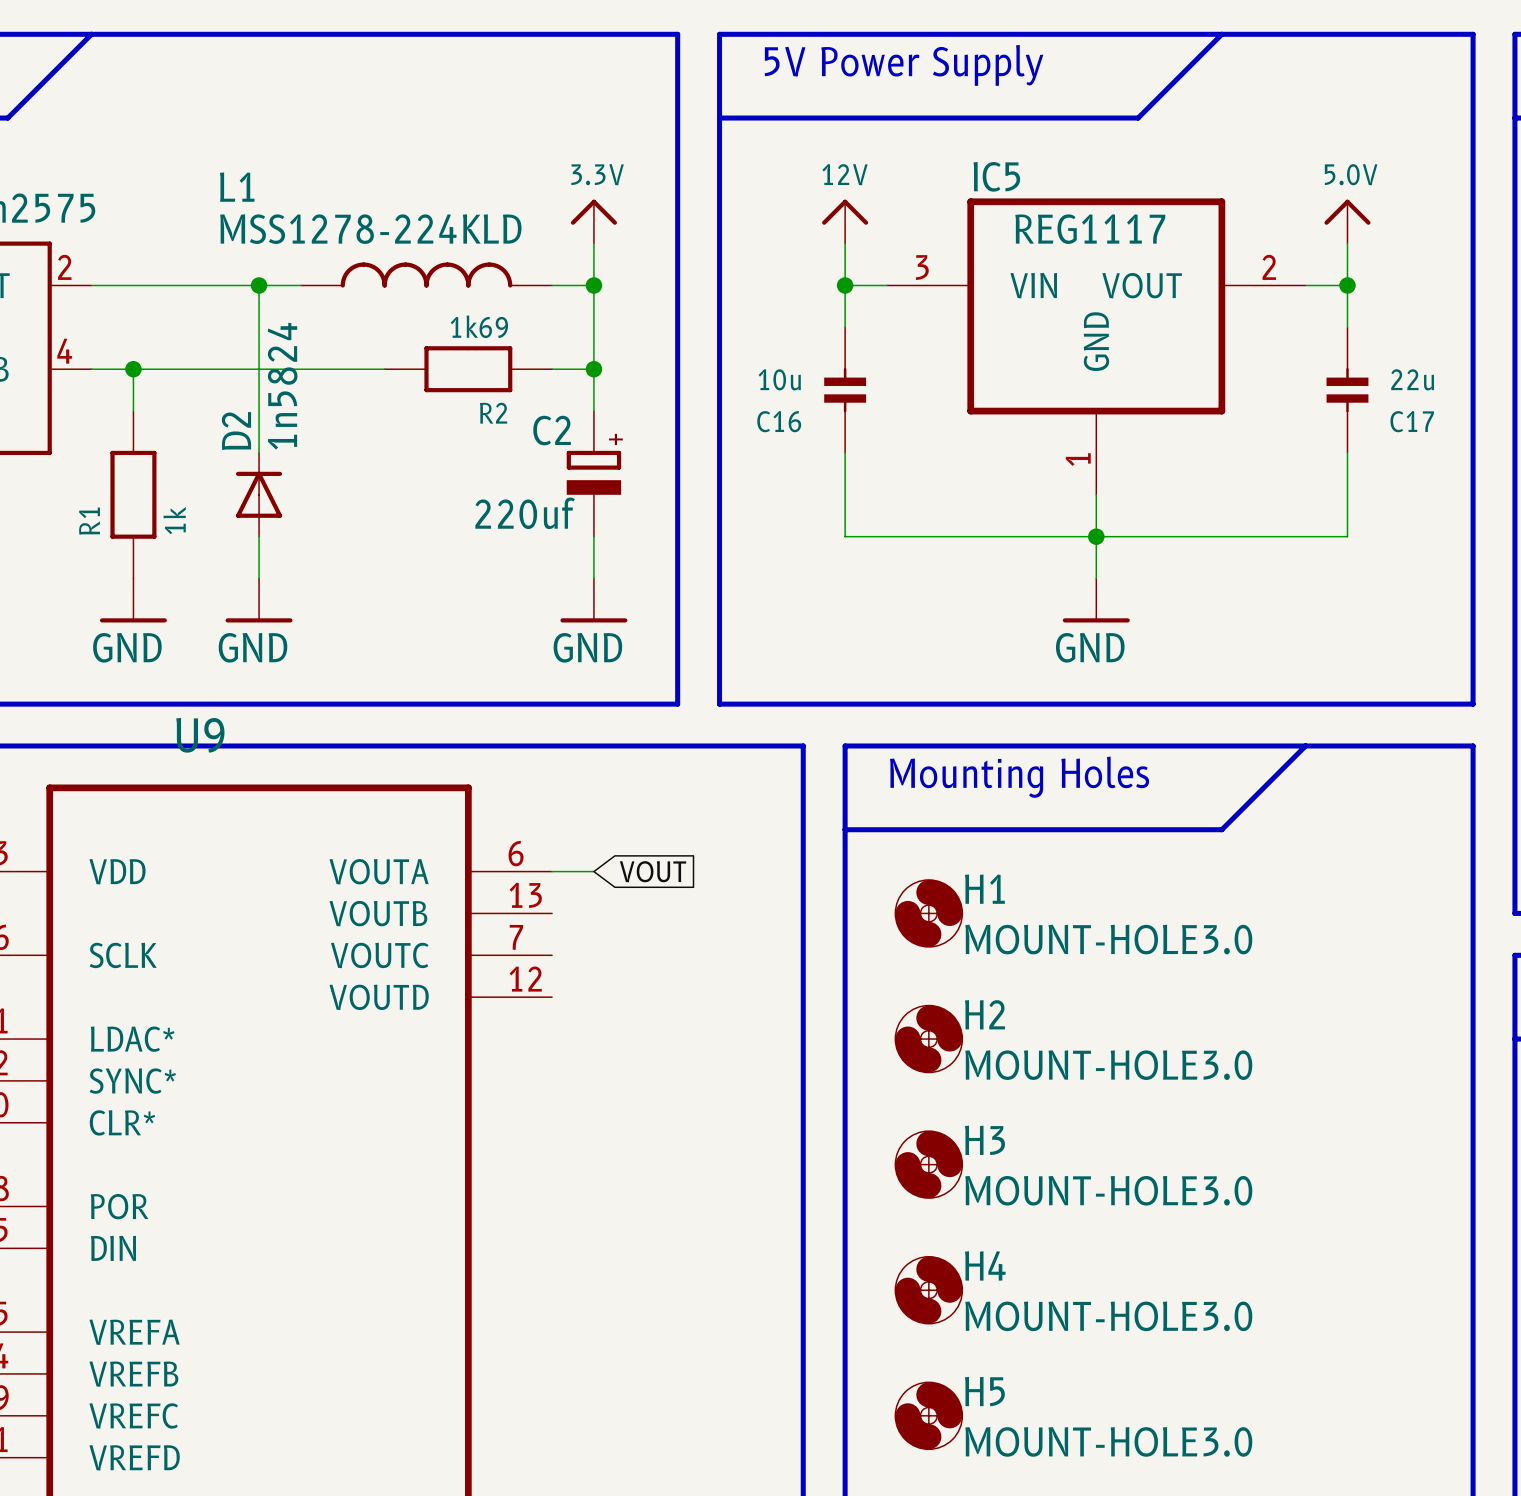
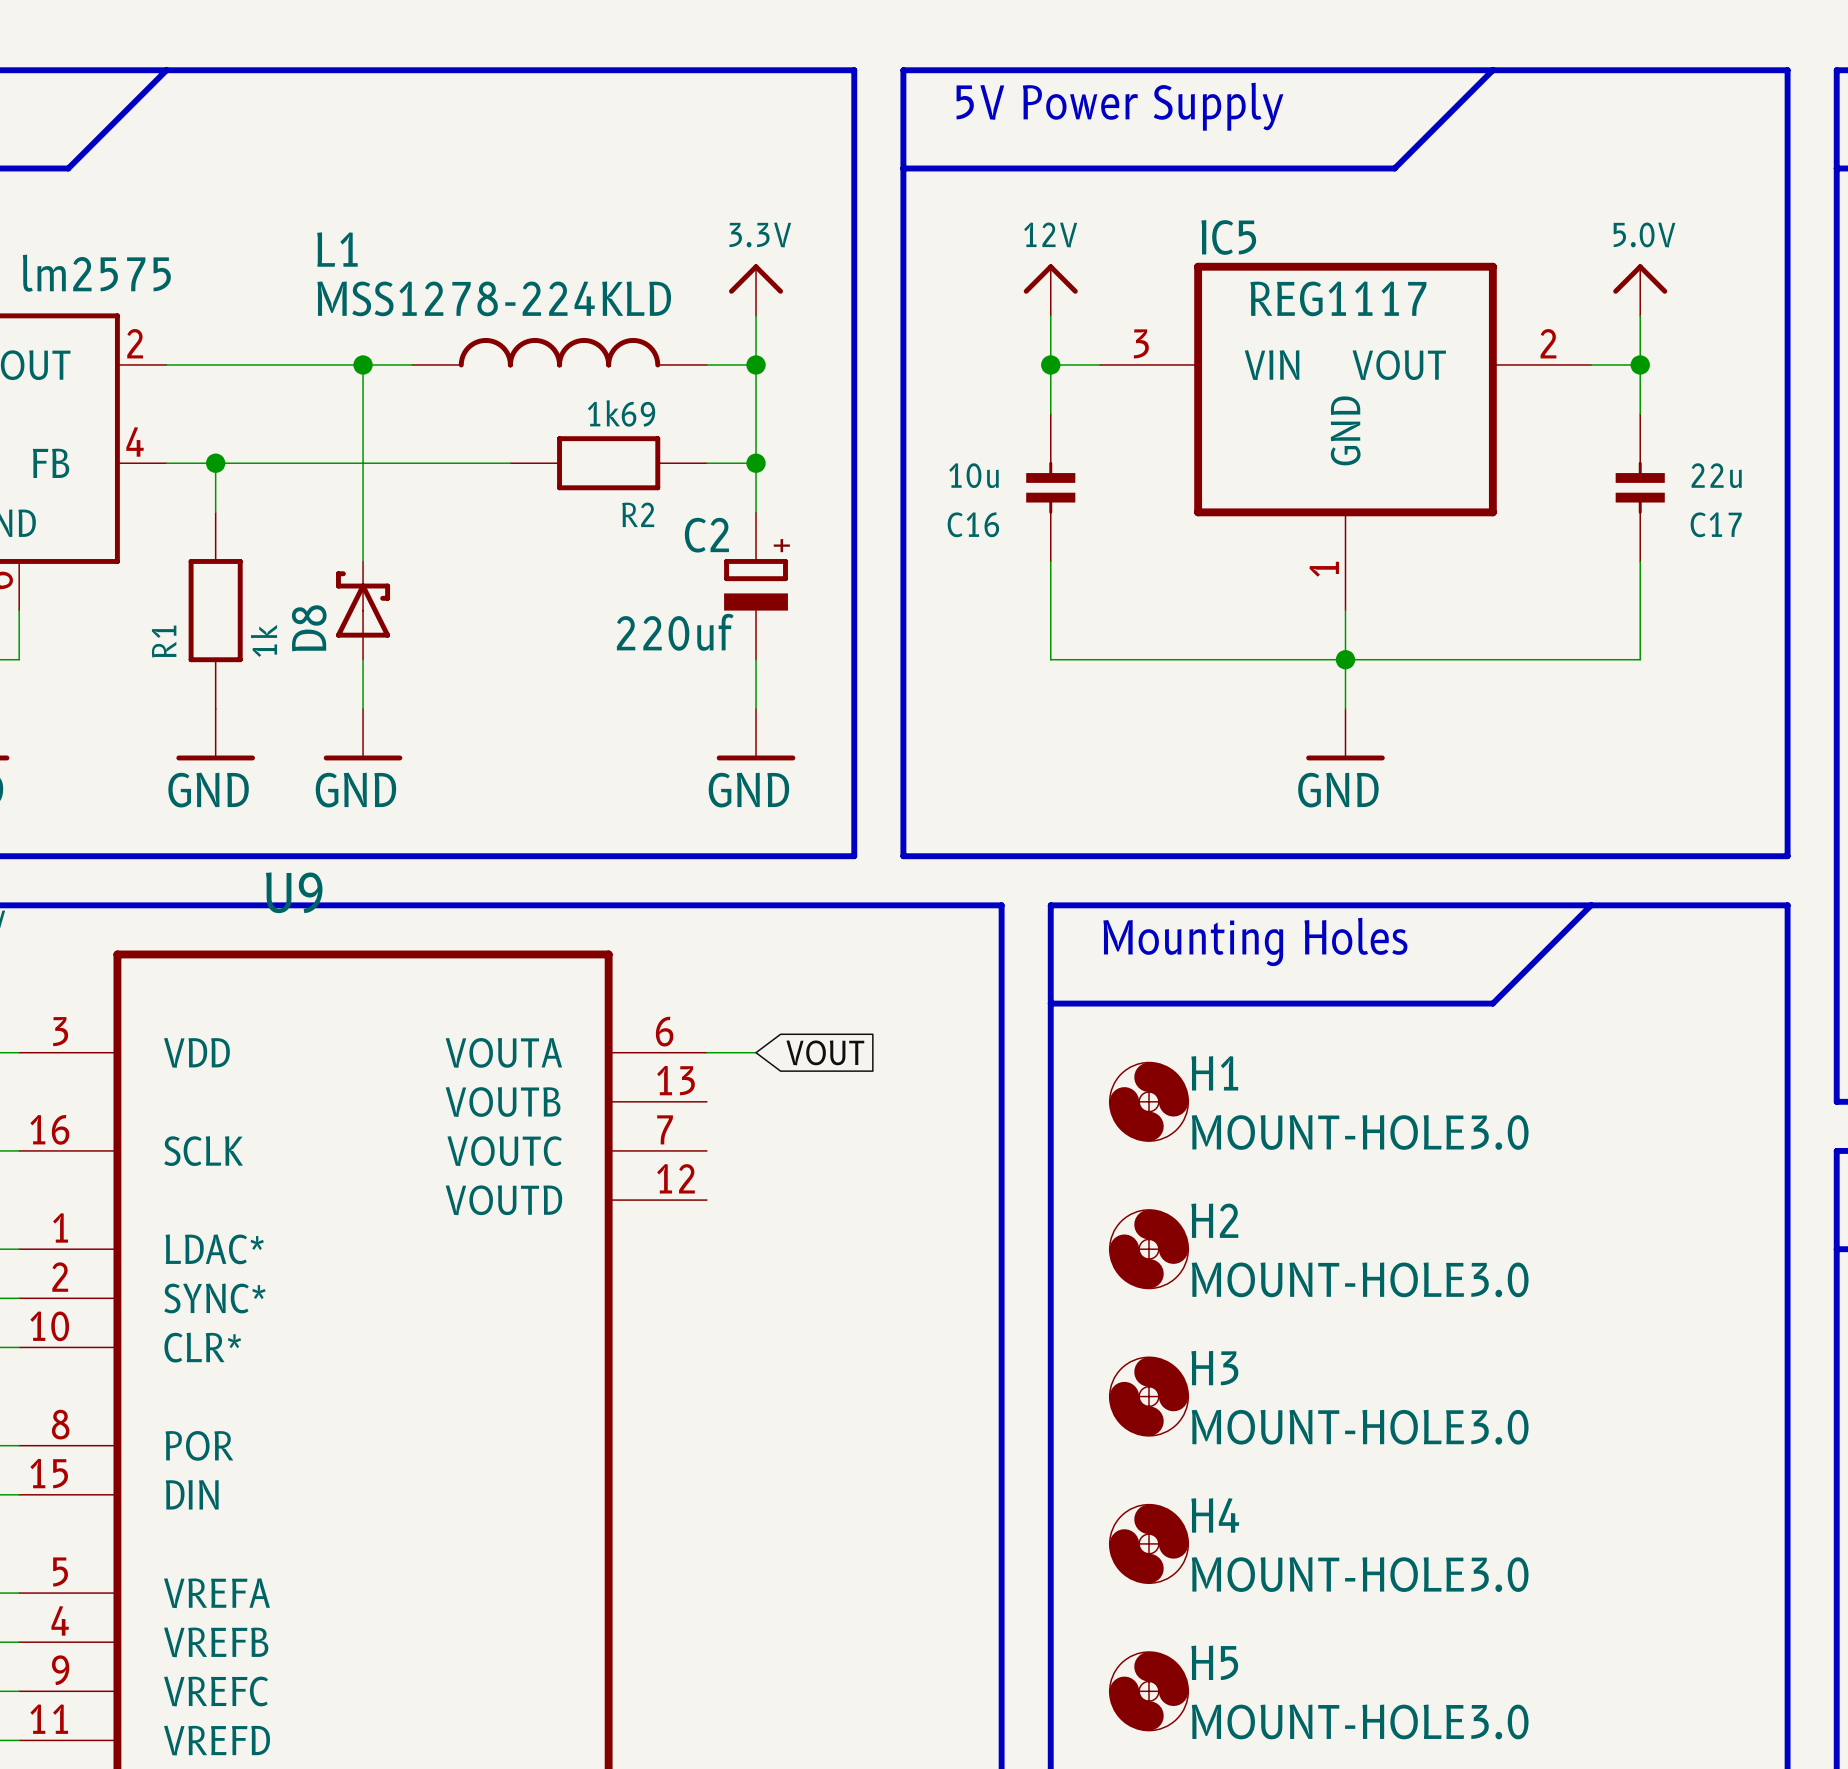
D2: 1n5824 (259, 494) -> none
D8: none -> (363, 610)

